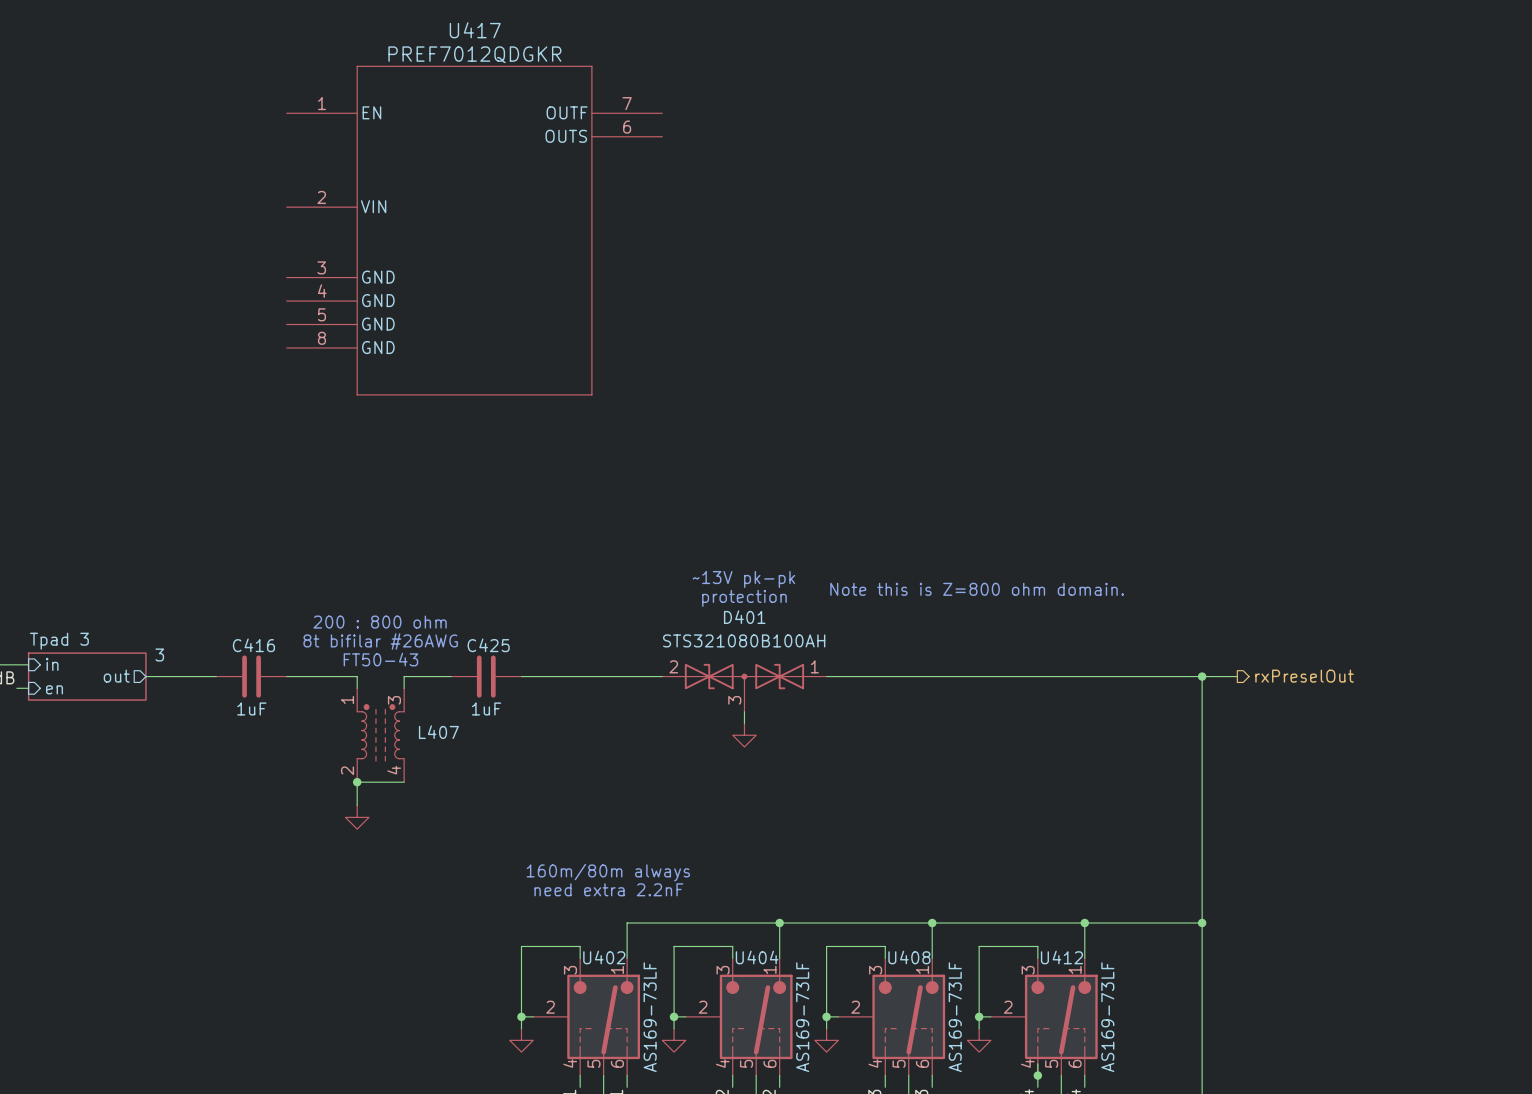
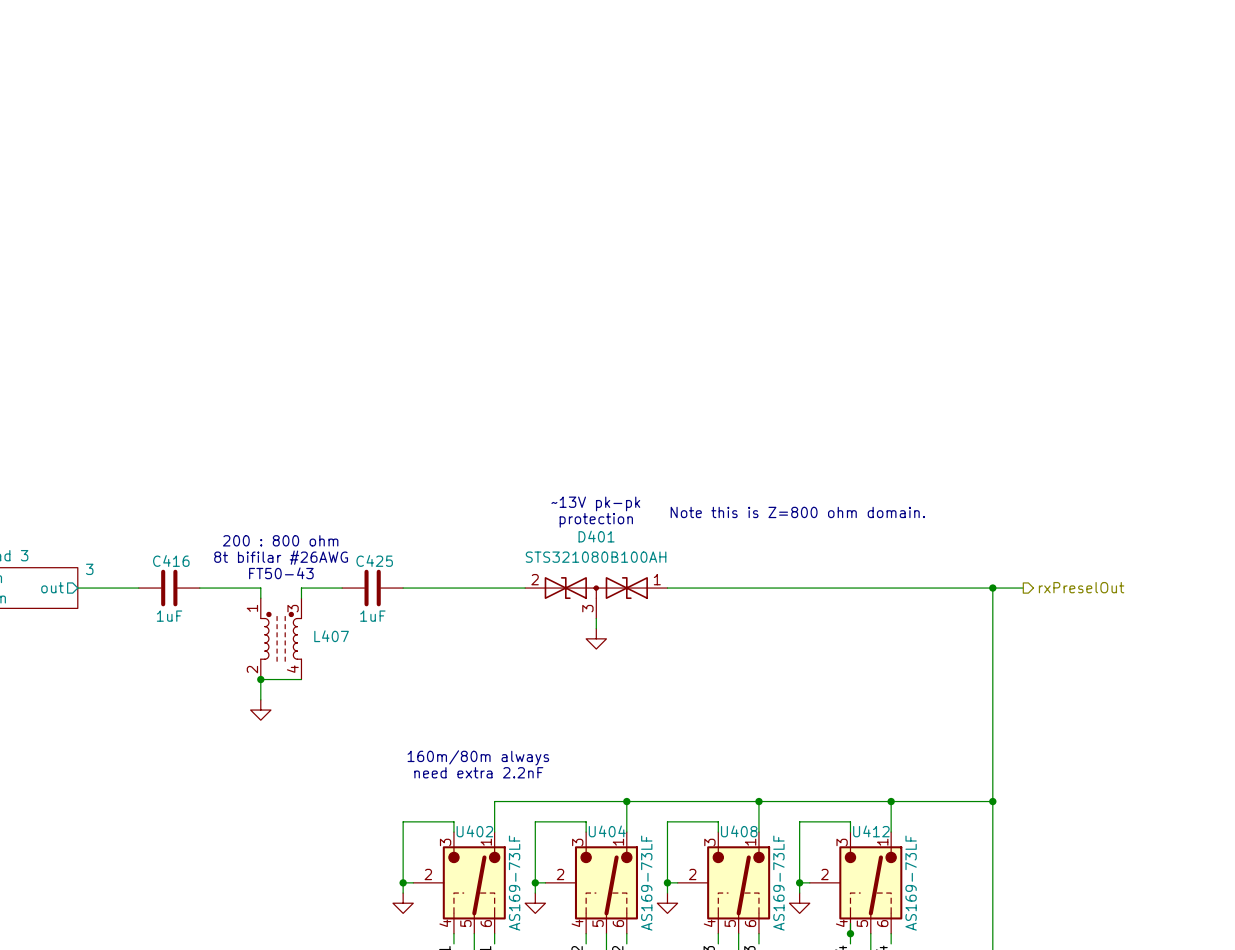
U417: PREF7012QDGKR (474, 230) -> none

